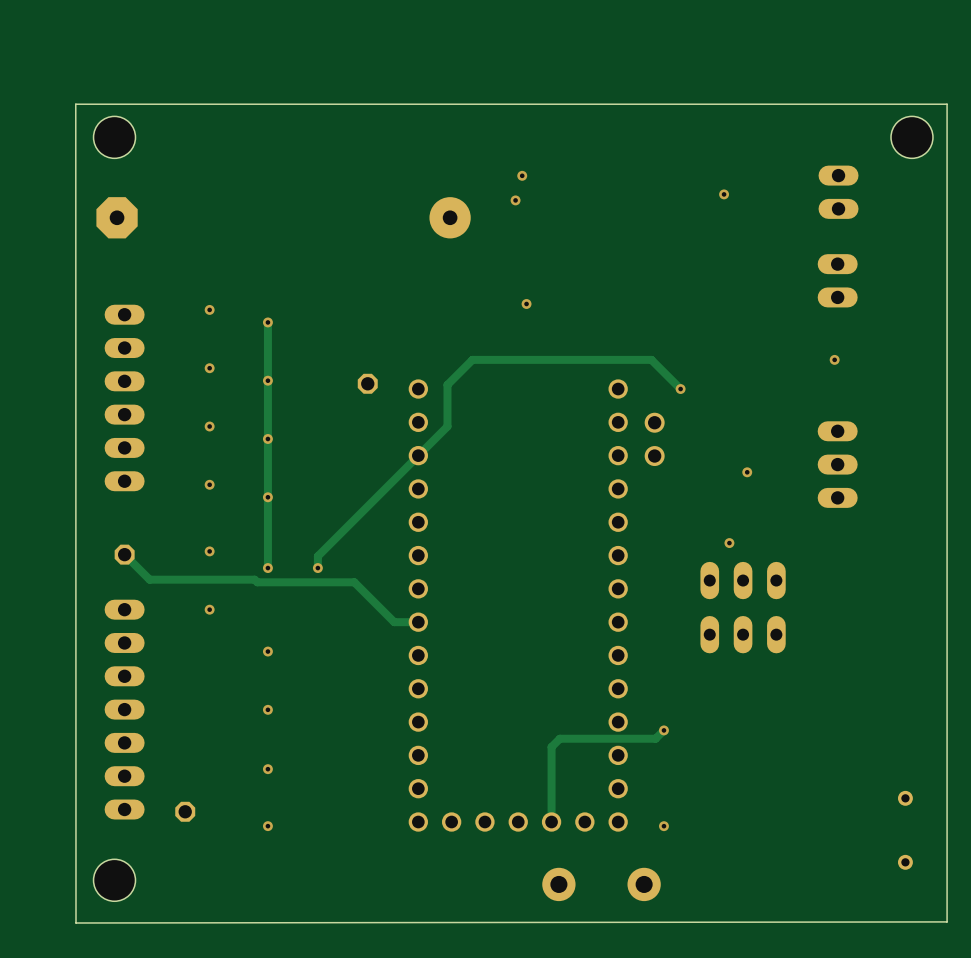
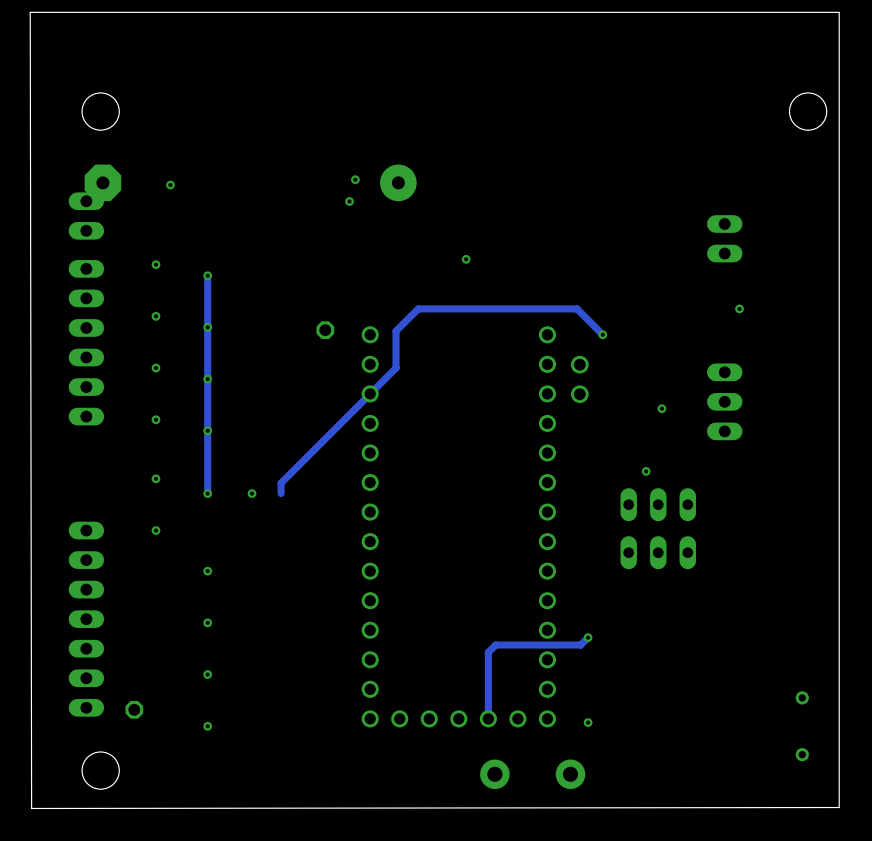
board edge: (947, 104) (75, 104) (76, 923) -> (839, 82) (839, 12) (30, 12) (31, 808) (66, 808)
via: (522, 175) -> none
part: (838, 192) -> none
via: (724, 194) -> none
via: (515, 200) -> none
via: none -> (355, 179)
via: none -> (170, 185)
via: none -> (349, 201)
part: none -> (86, 216)
part position: (837, 280) -> (724, 238)
via: none -> (155, 264)
via: (209, 309) -> none
via: none -> (207, 275)
track: (267, 322) (267, 568) -> (207, 275) (207, 493)
via: (267, 322) -> none
via: none -> (155, 316)
via: (209, 368) -> none
via: none -> (207, 327)
via: (267, 380) -> none
part position: (124, 397) -> (86, 342)
via: none -> (155, 368)
via: (209, 426) -> none
via: none -> (207, 379)
via: (267, 438) -> none
part position: (837, 464) -> (724, 401)
via: none -> (155, 419)
via: (209, 484) -> none
via: none -> (207, 430)
via: (267, 497) -> none
via: none -> (155, 478)
via: (209, 551) -> none
track: (124, 554) (149, 579) (354, 582) (394, 622) (418, 622) -> none
part: (124, 554) -> none
via: none -> (207, 493)
via: (267, 568) -> none
via: none -> (252, 493)
via: (317, 568) -> none
via: none -> (155, 530)
via: (209, 609) -> none
via: (267, 651) -> none
via: none -> (207, 571)
part position: (124, 709) -> (86, 619)
via: (267, 709) -> none
via: none -> (207, 622)
via: (267, 769) -> none
via: none -> (207, 674)
part position: (185, 811) -> (134, 709)
via: (267, 826) -> none
via: none -> (207, 726)

